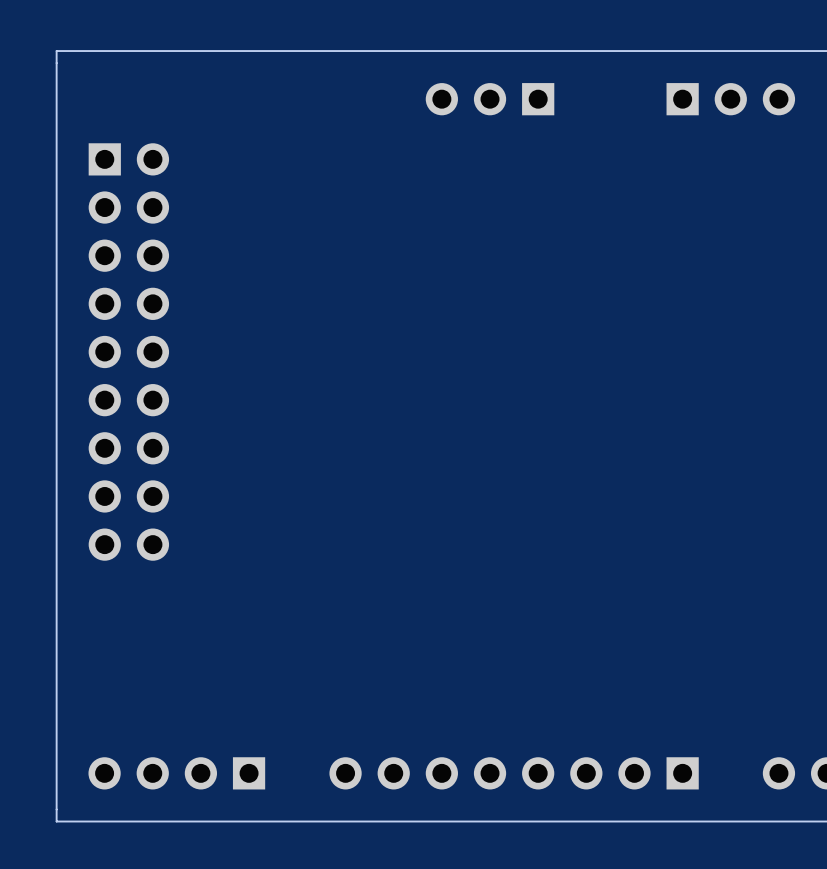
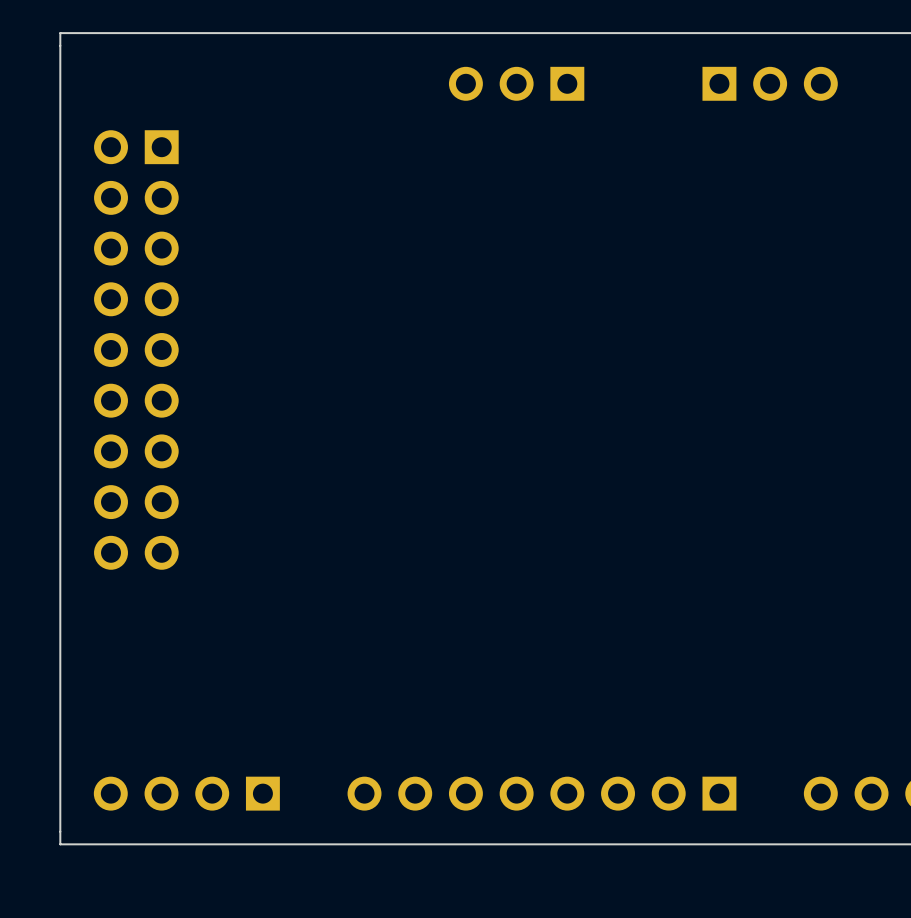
part footprint: [88, 143, 170, 561] -> [94, 130, 179, 570]

